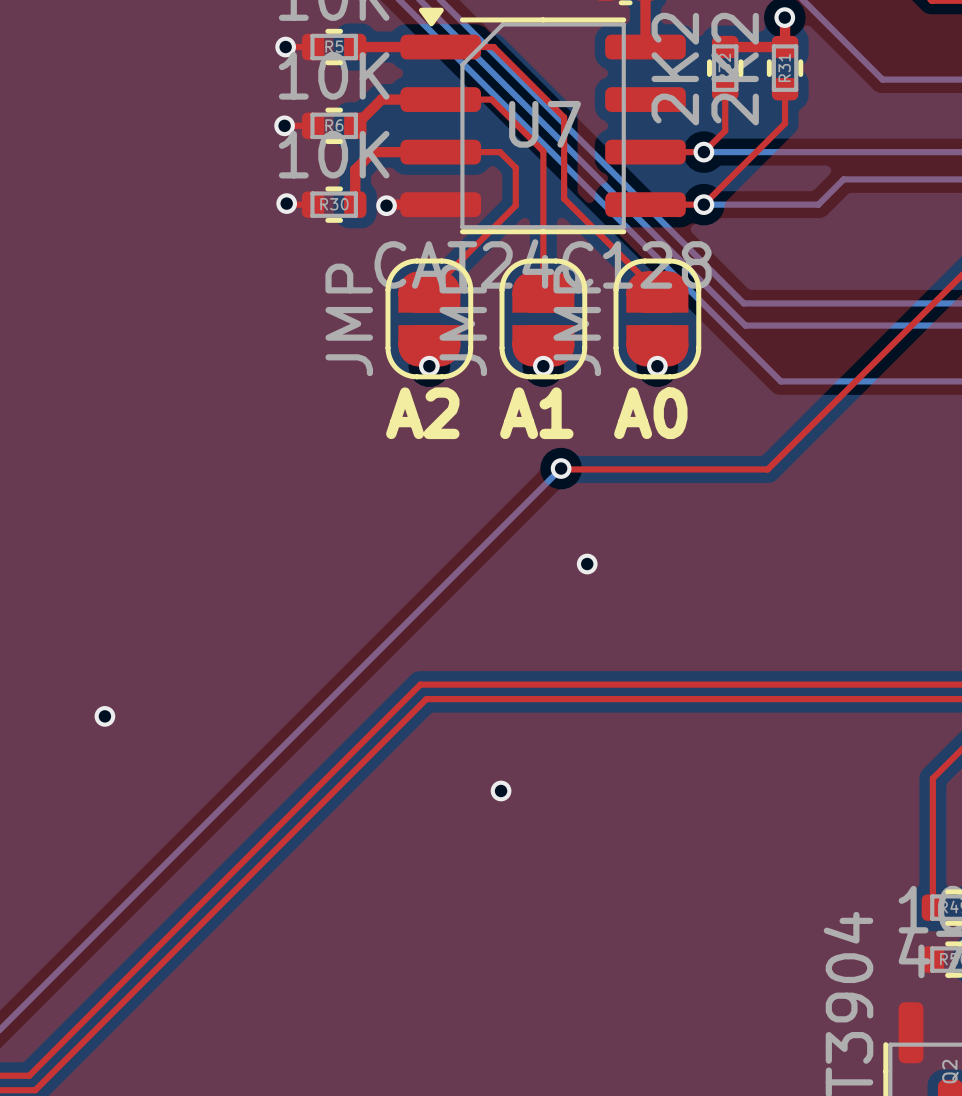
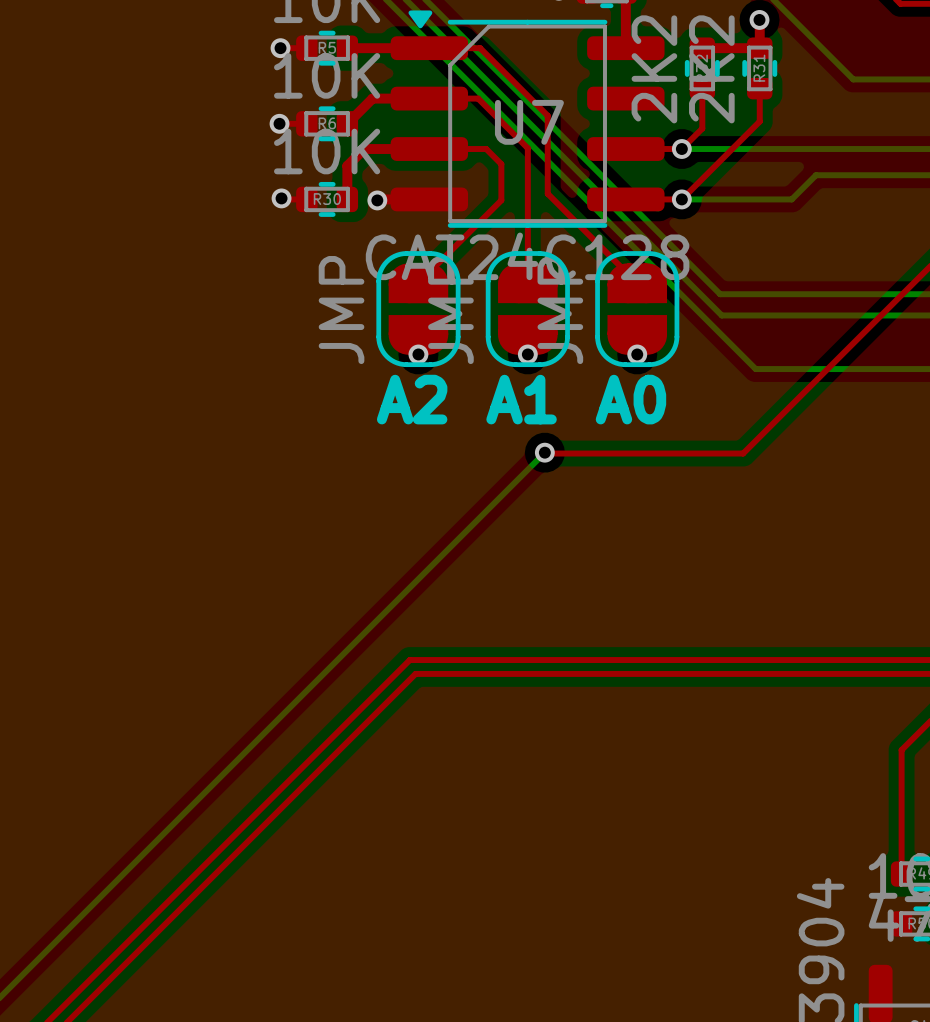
via: (587, 564) -> none
via: (104, 716) -> none
via: (501, 790) -> none

